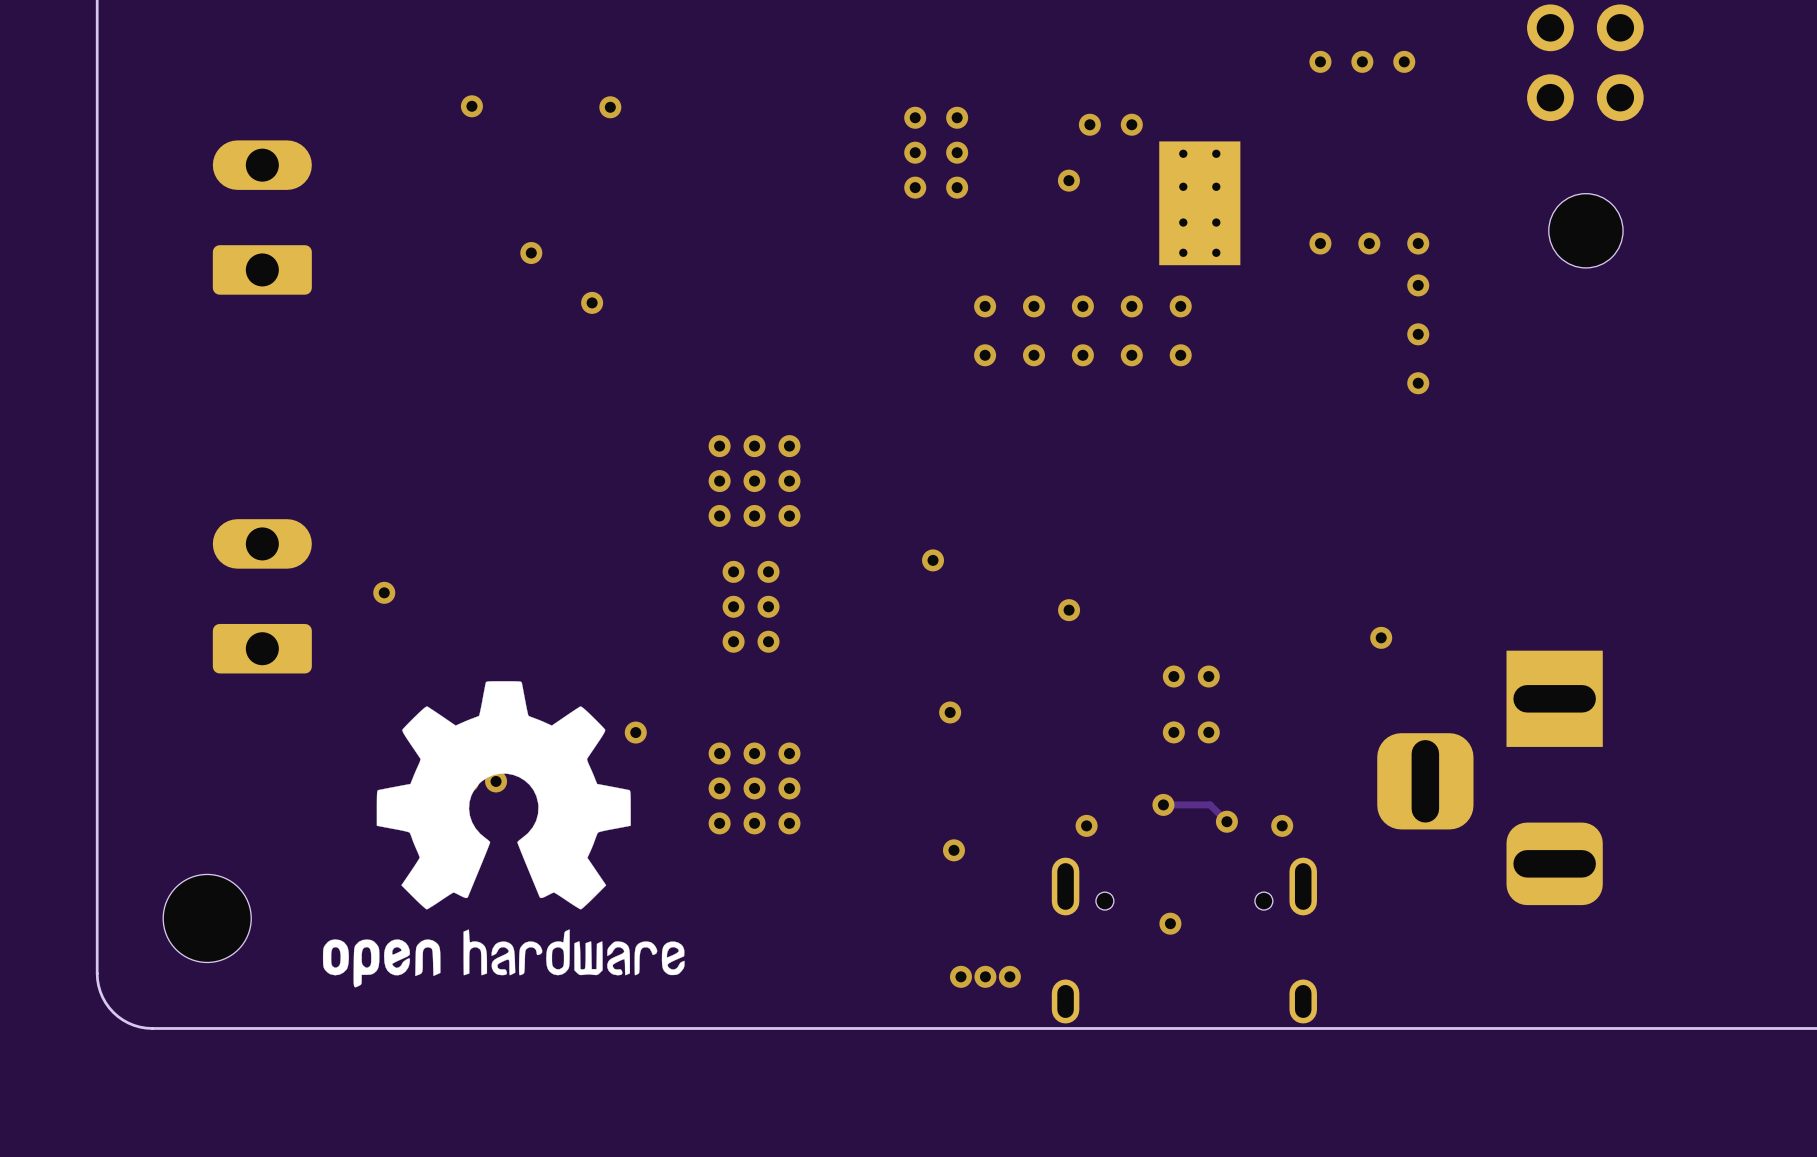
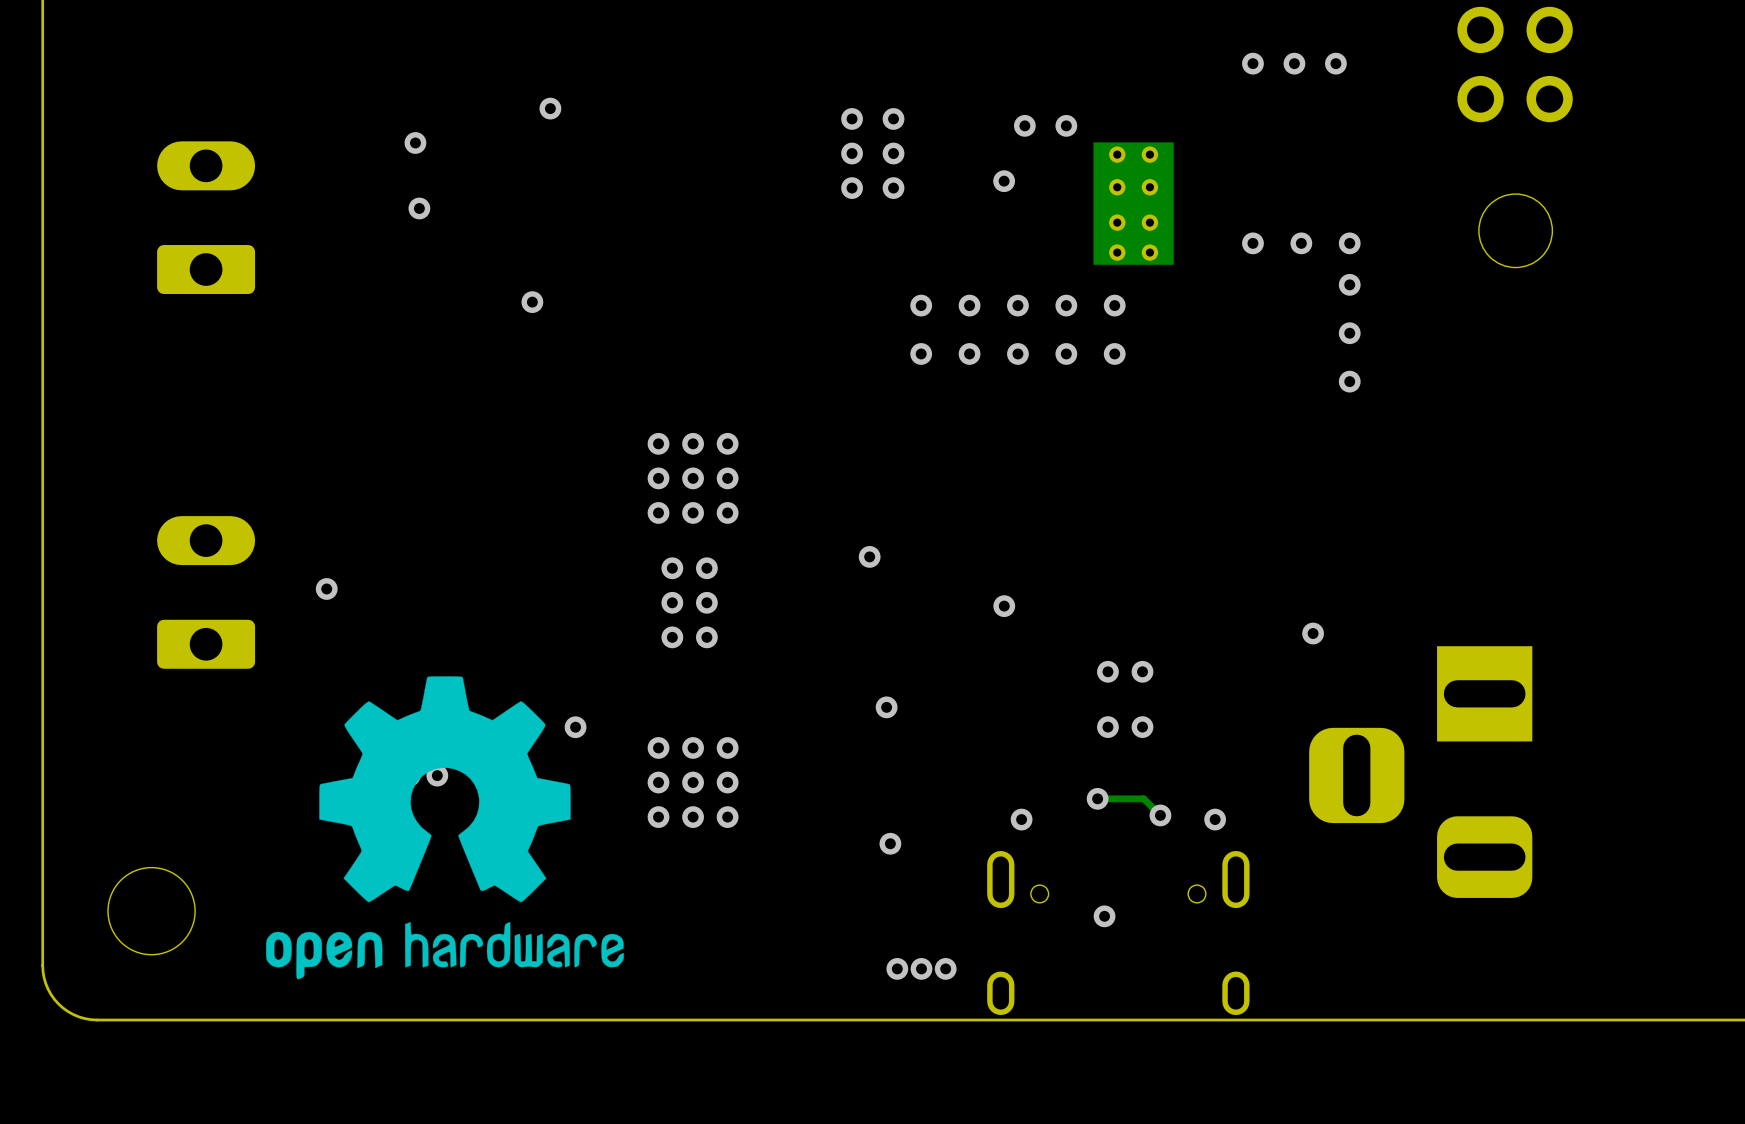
via position: (471, 106) -> (415, 142)
via: none -> (419, 208)
via: (531, 253) -> none

